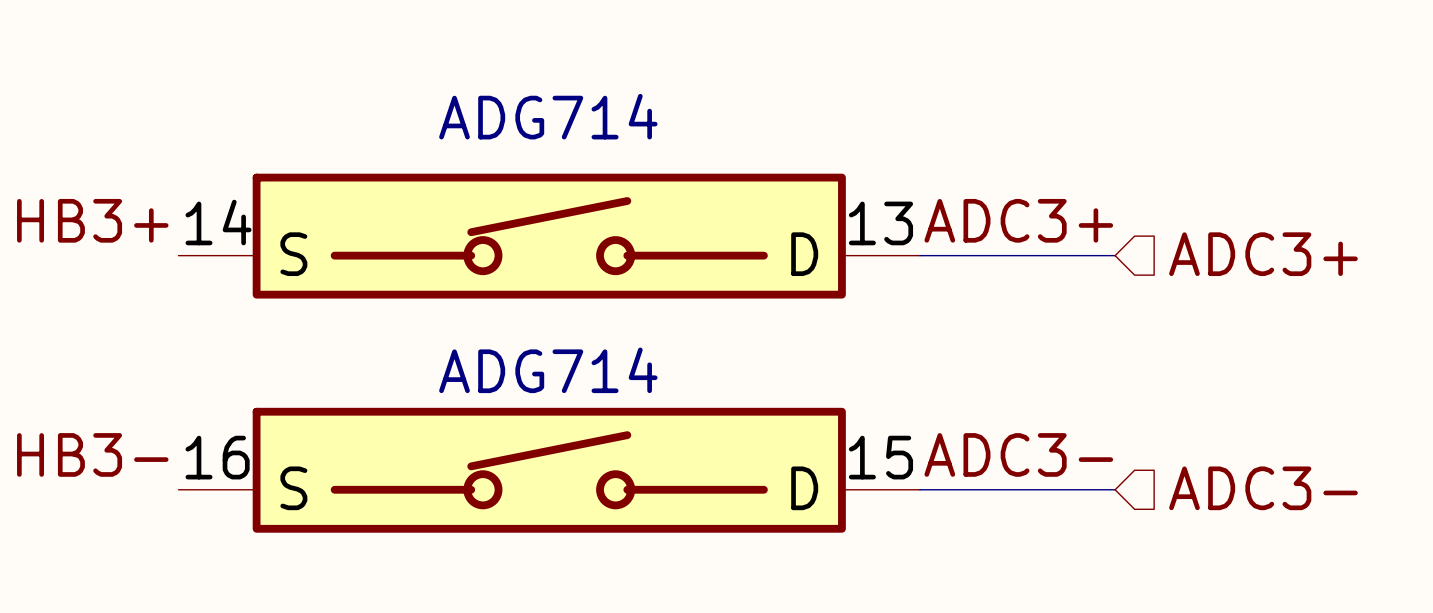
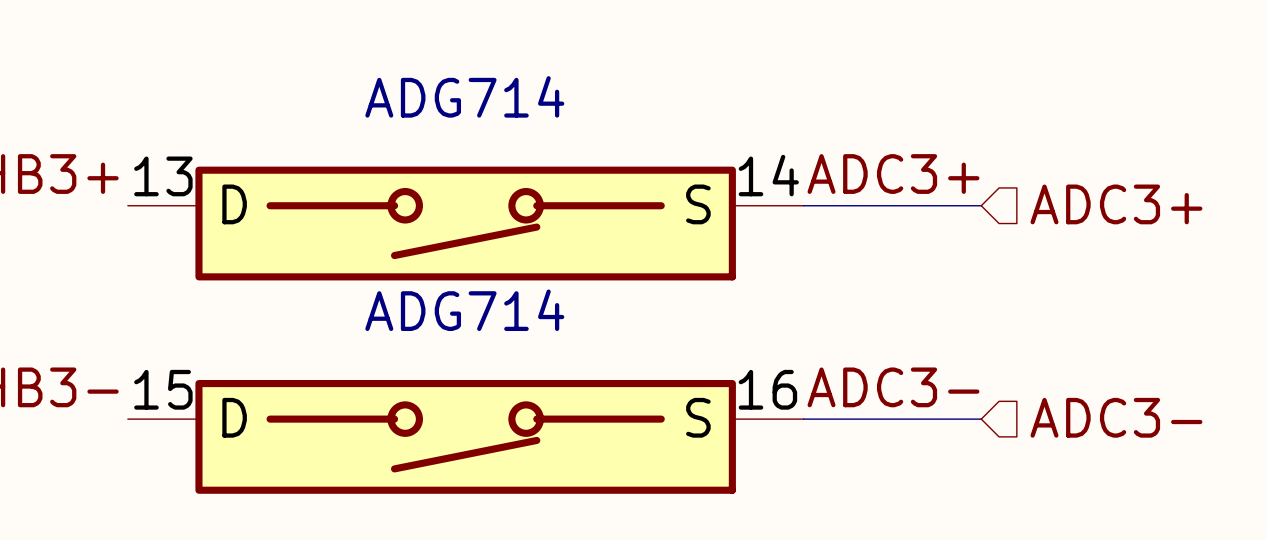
part rotation: 0° (549, 236) -> 180° (465, 223)
part rotation: 0° (549, 470) -> 180° (465, 436)

